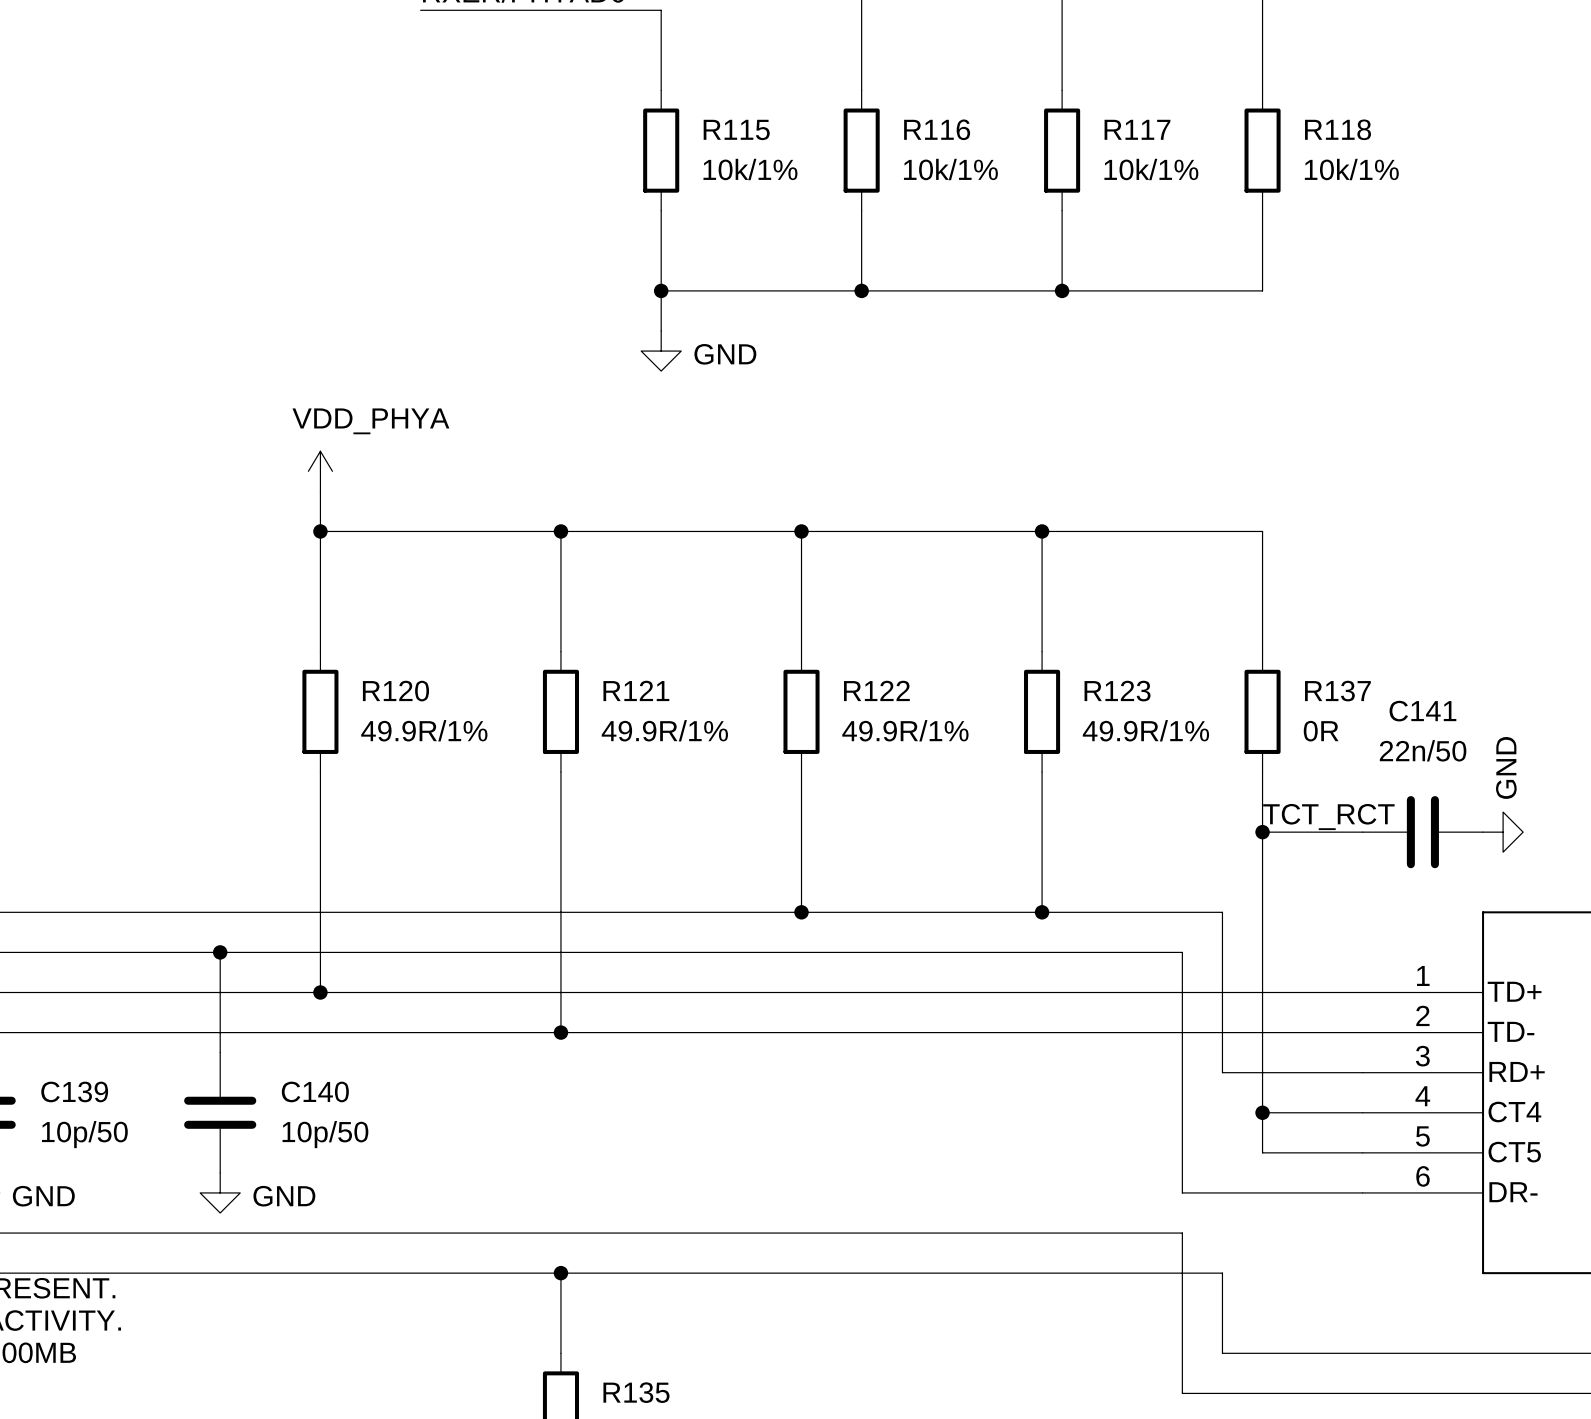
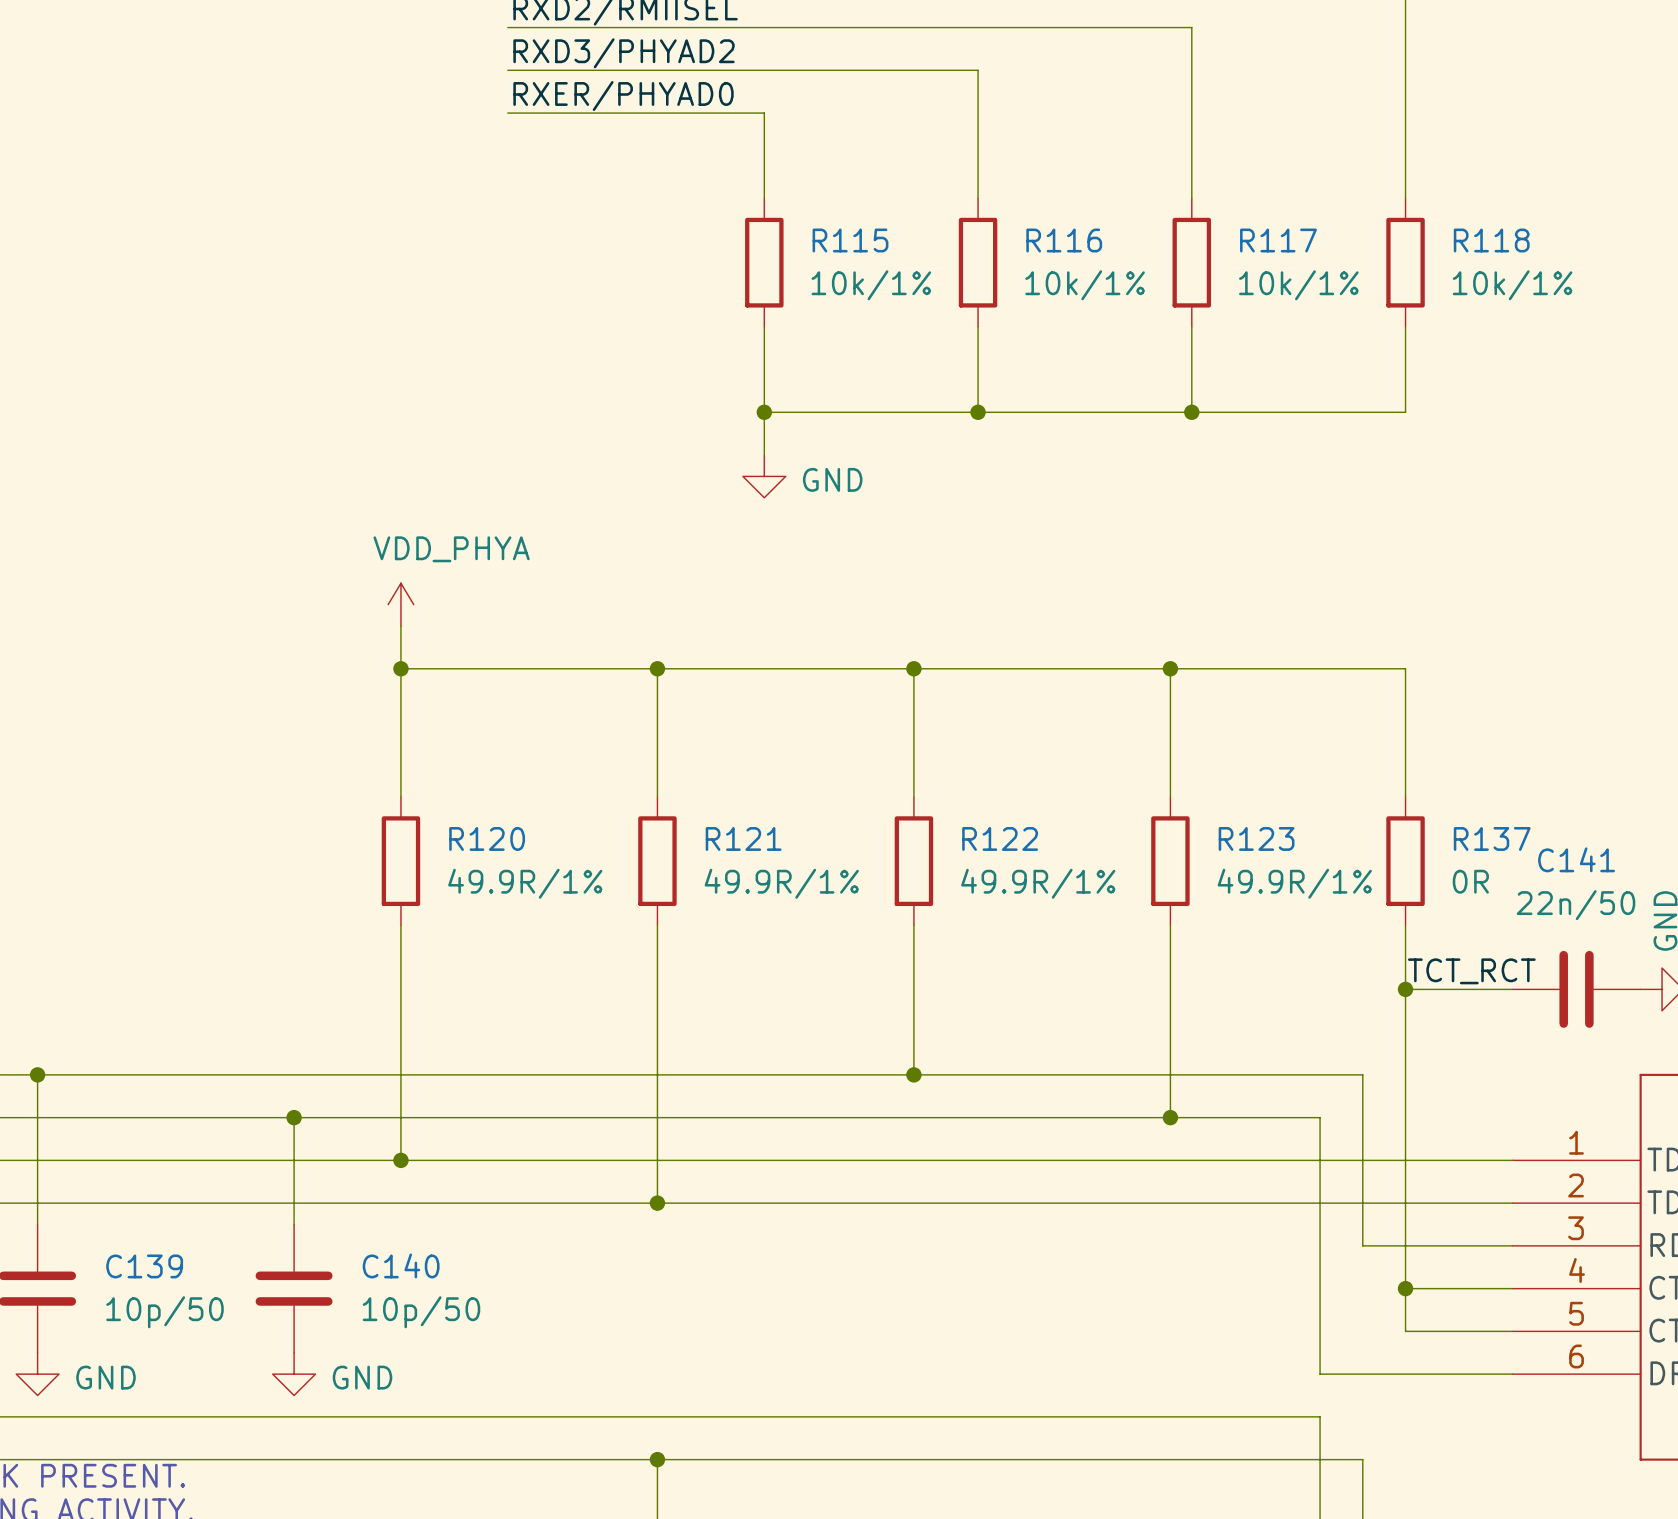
wire: none -> (1170, 1074) (1170, 1117)
junction position: (1042, 912) -> (1170, 1117)

